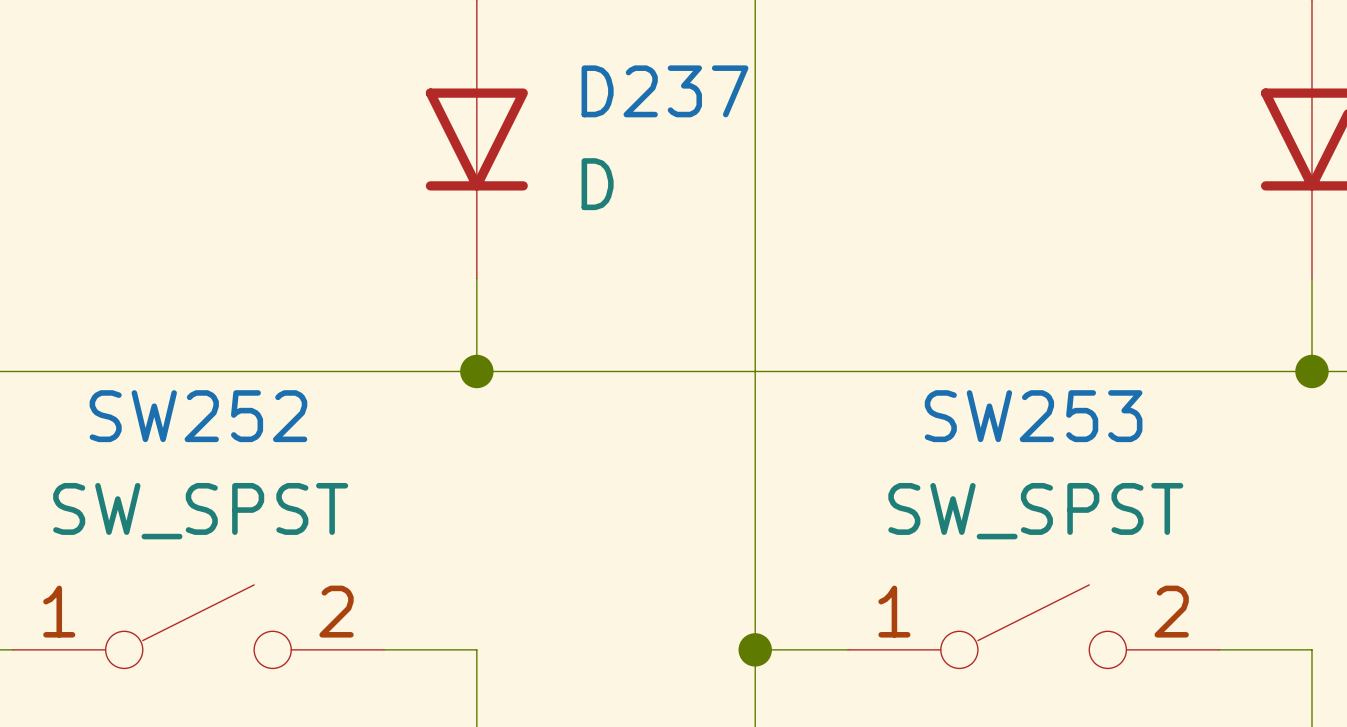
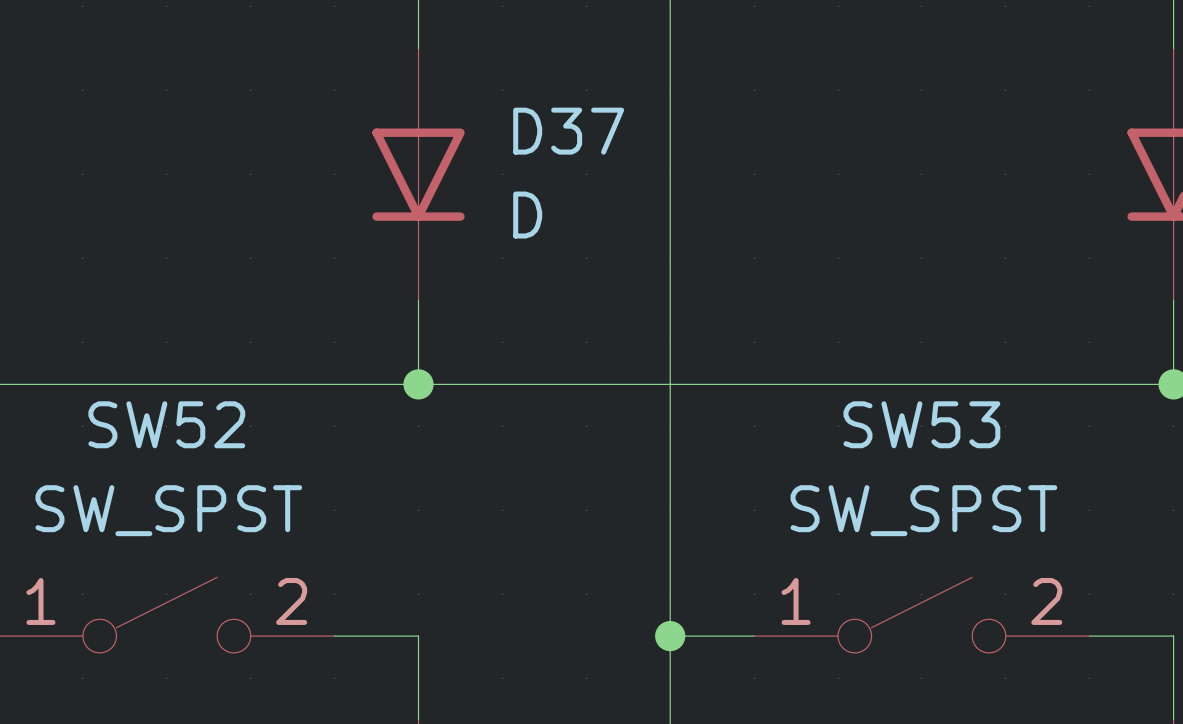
D237 name: D237 (664, 91) -> D37 (568, 131)
SW252 name: SW252 (198, 416) -> SW52 (166, 424)
SW253 name: SW253 (1033, 416) -> SW53 (921, 424)

